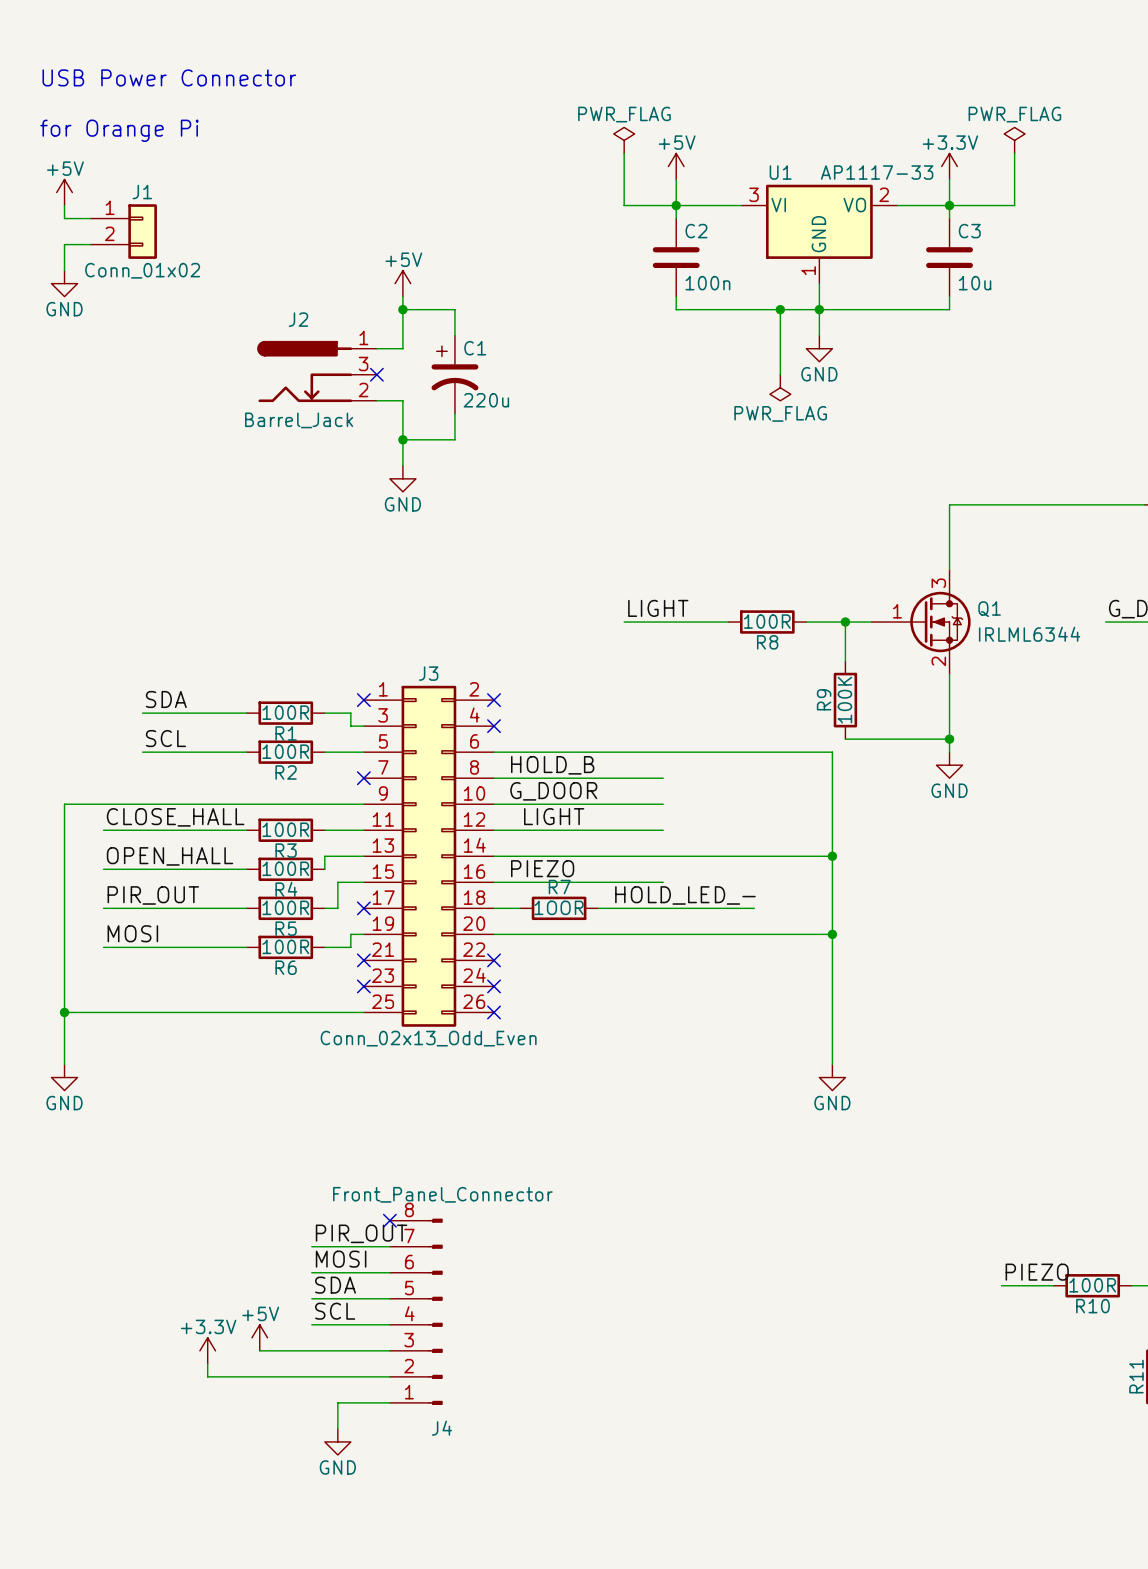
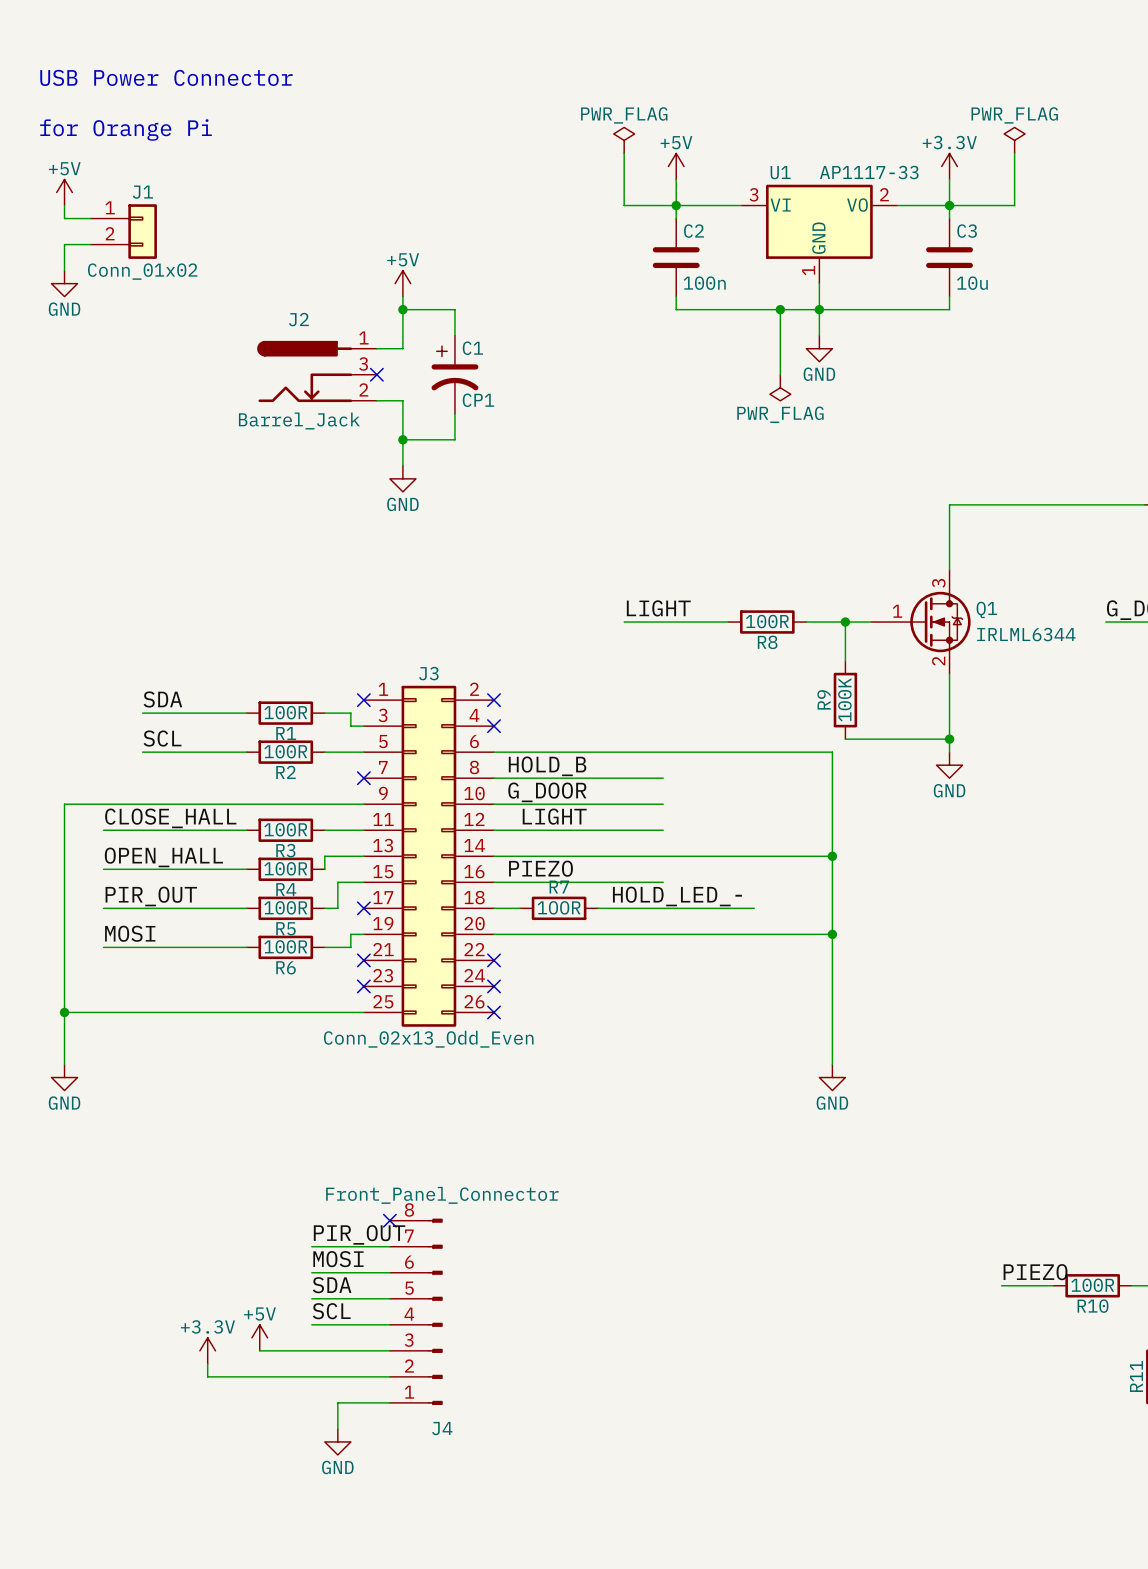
C1 value: 220u (486, 400) -> CP1 (478, 400)

